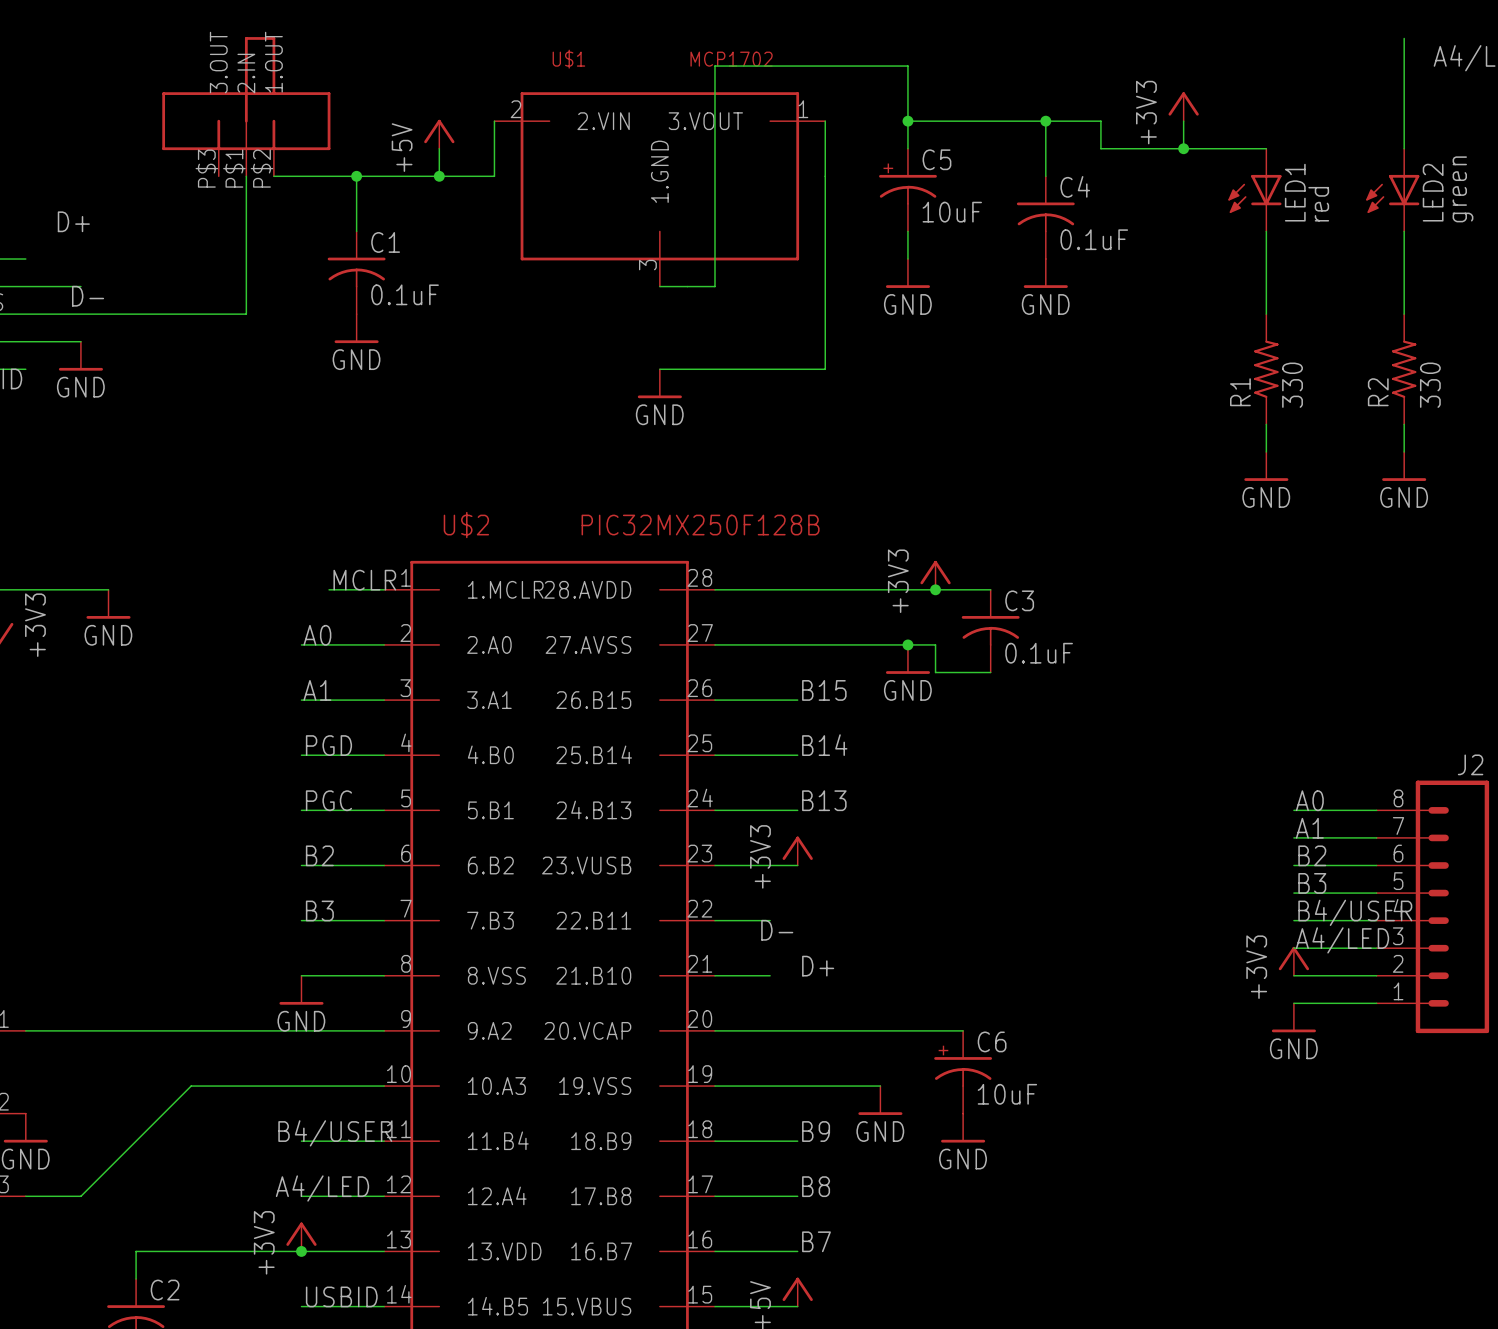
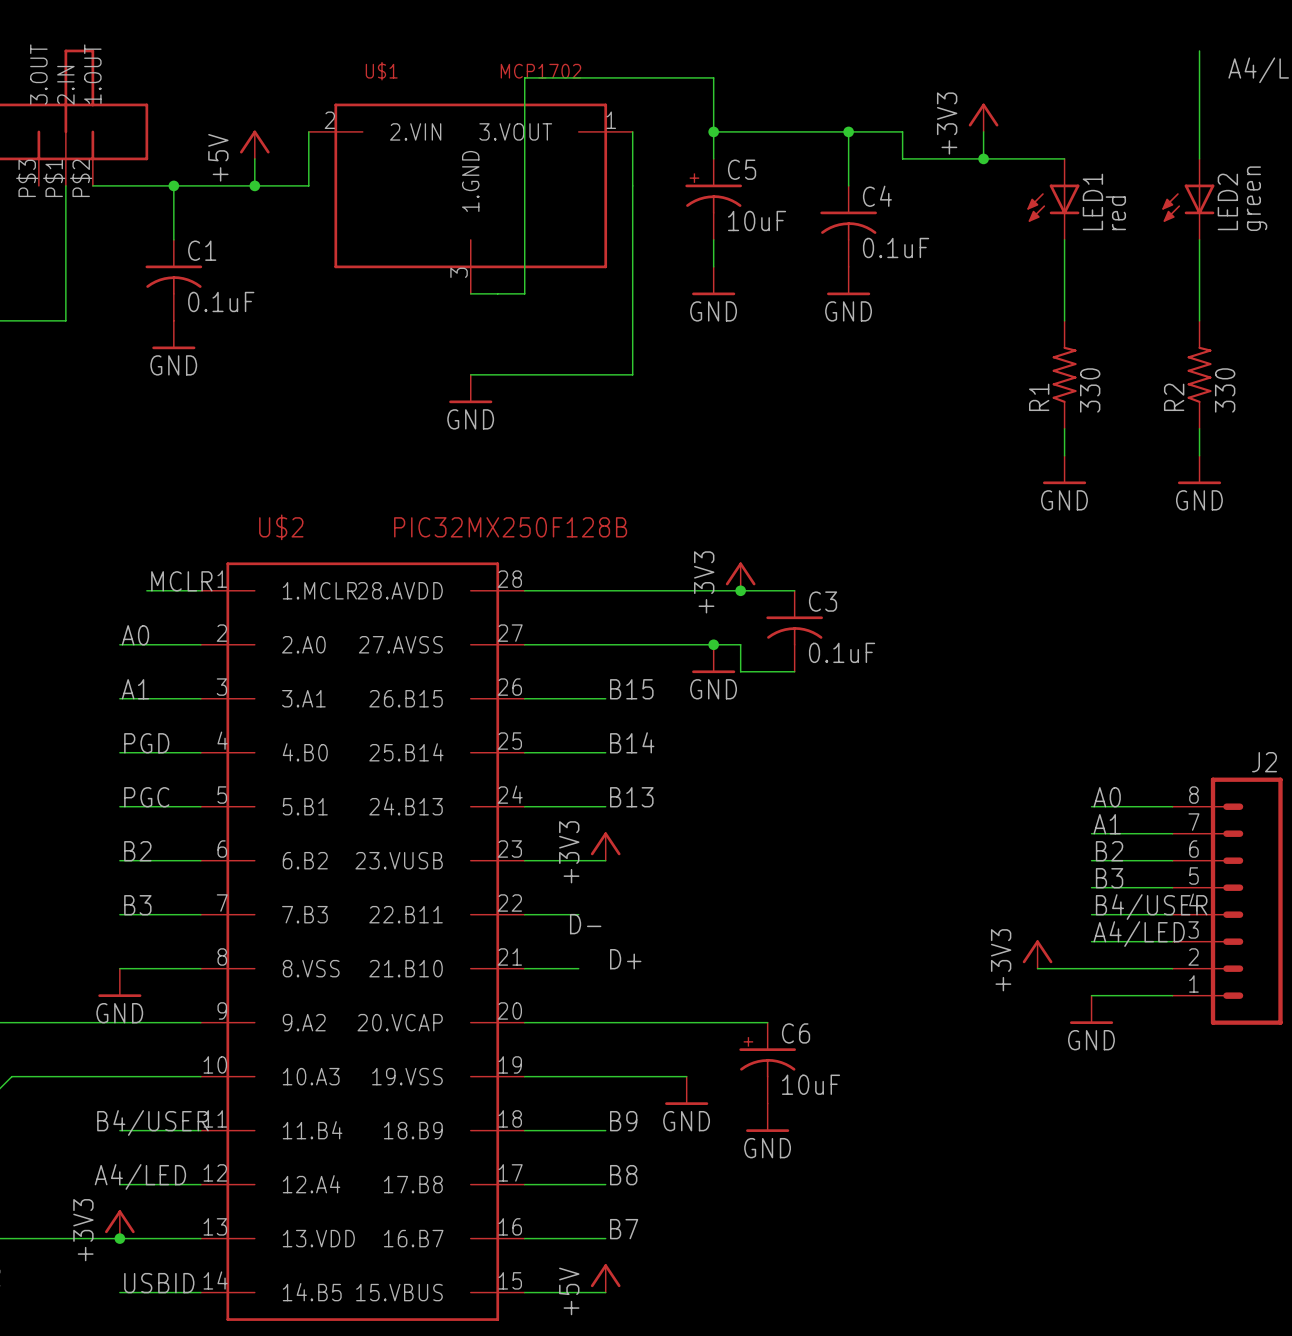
power symbol position: +3V3 (1293, 961) -> +3V3 (1037, 954)
wire: none -> (1037, 968) (1091, 968)

